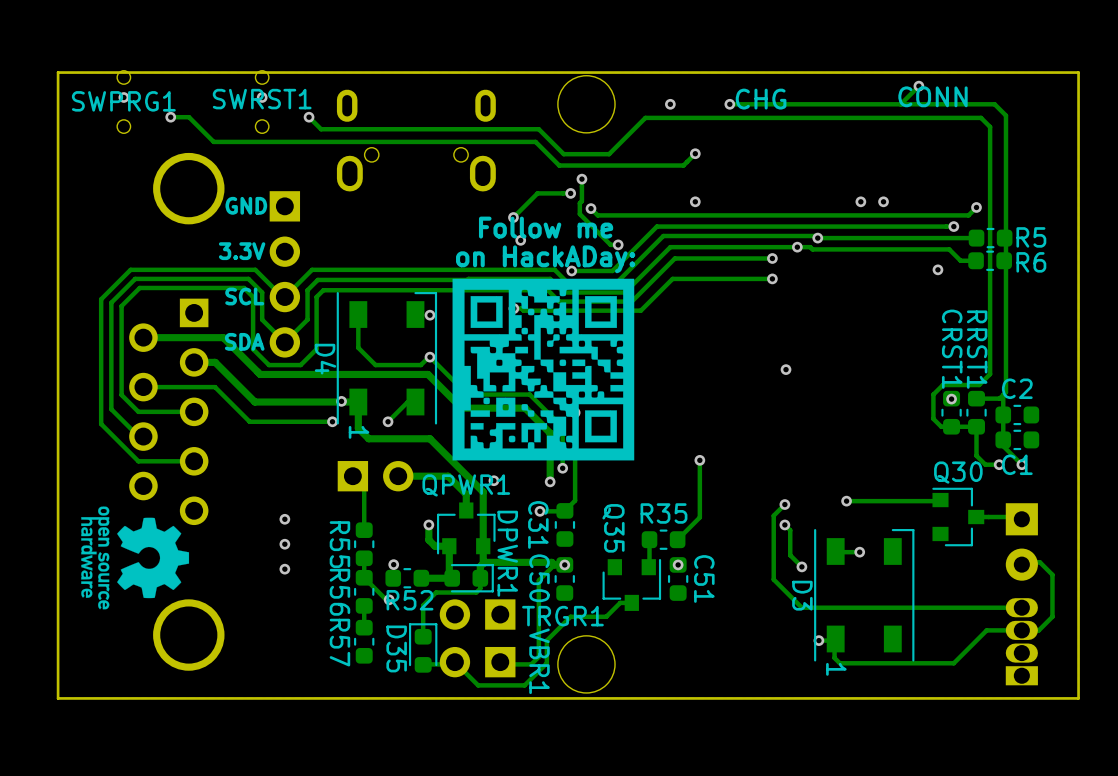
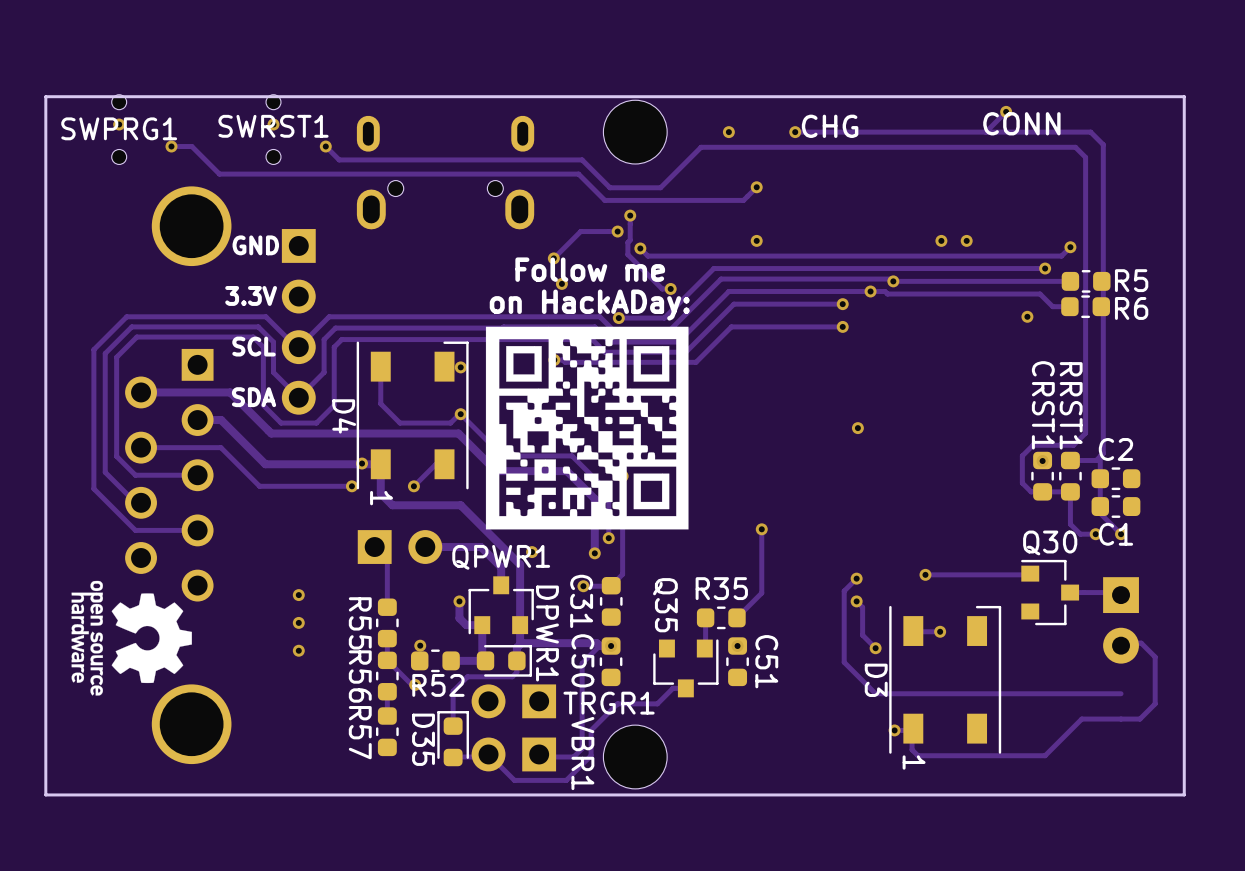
part: (1021, 641) -> none

